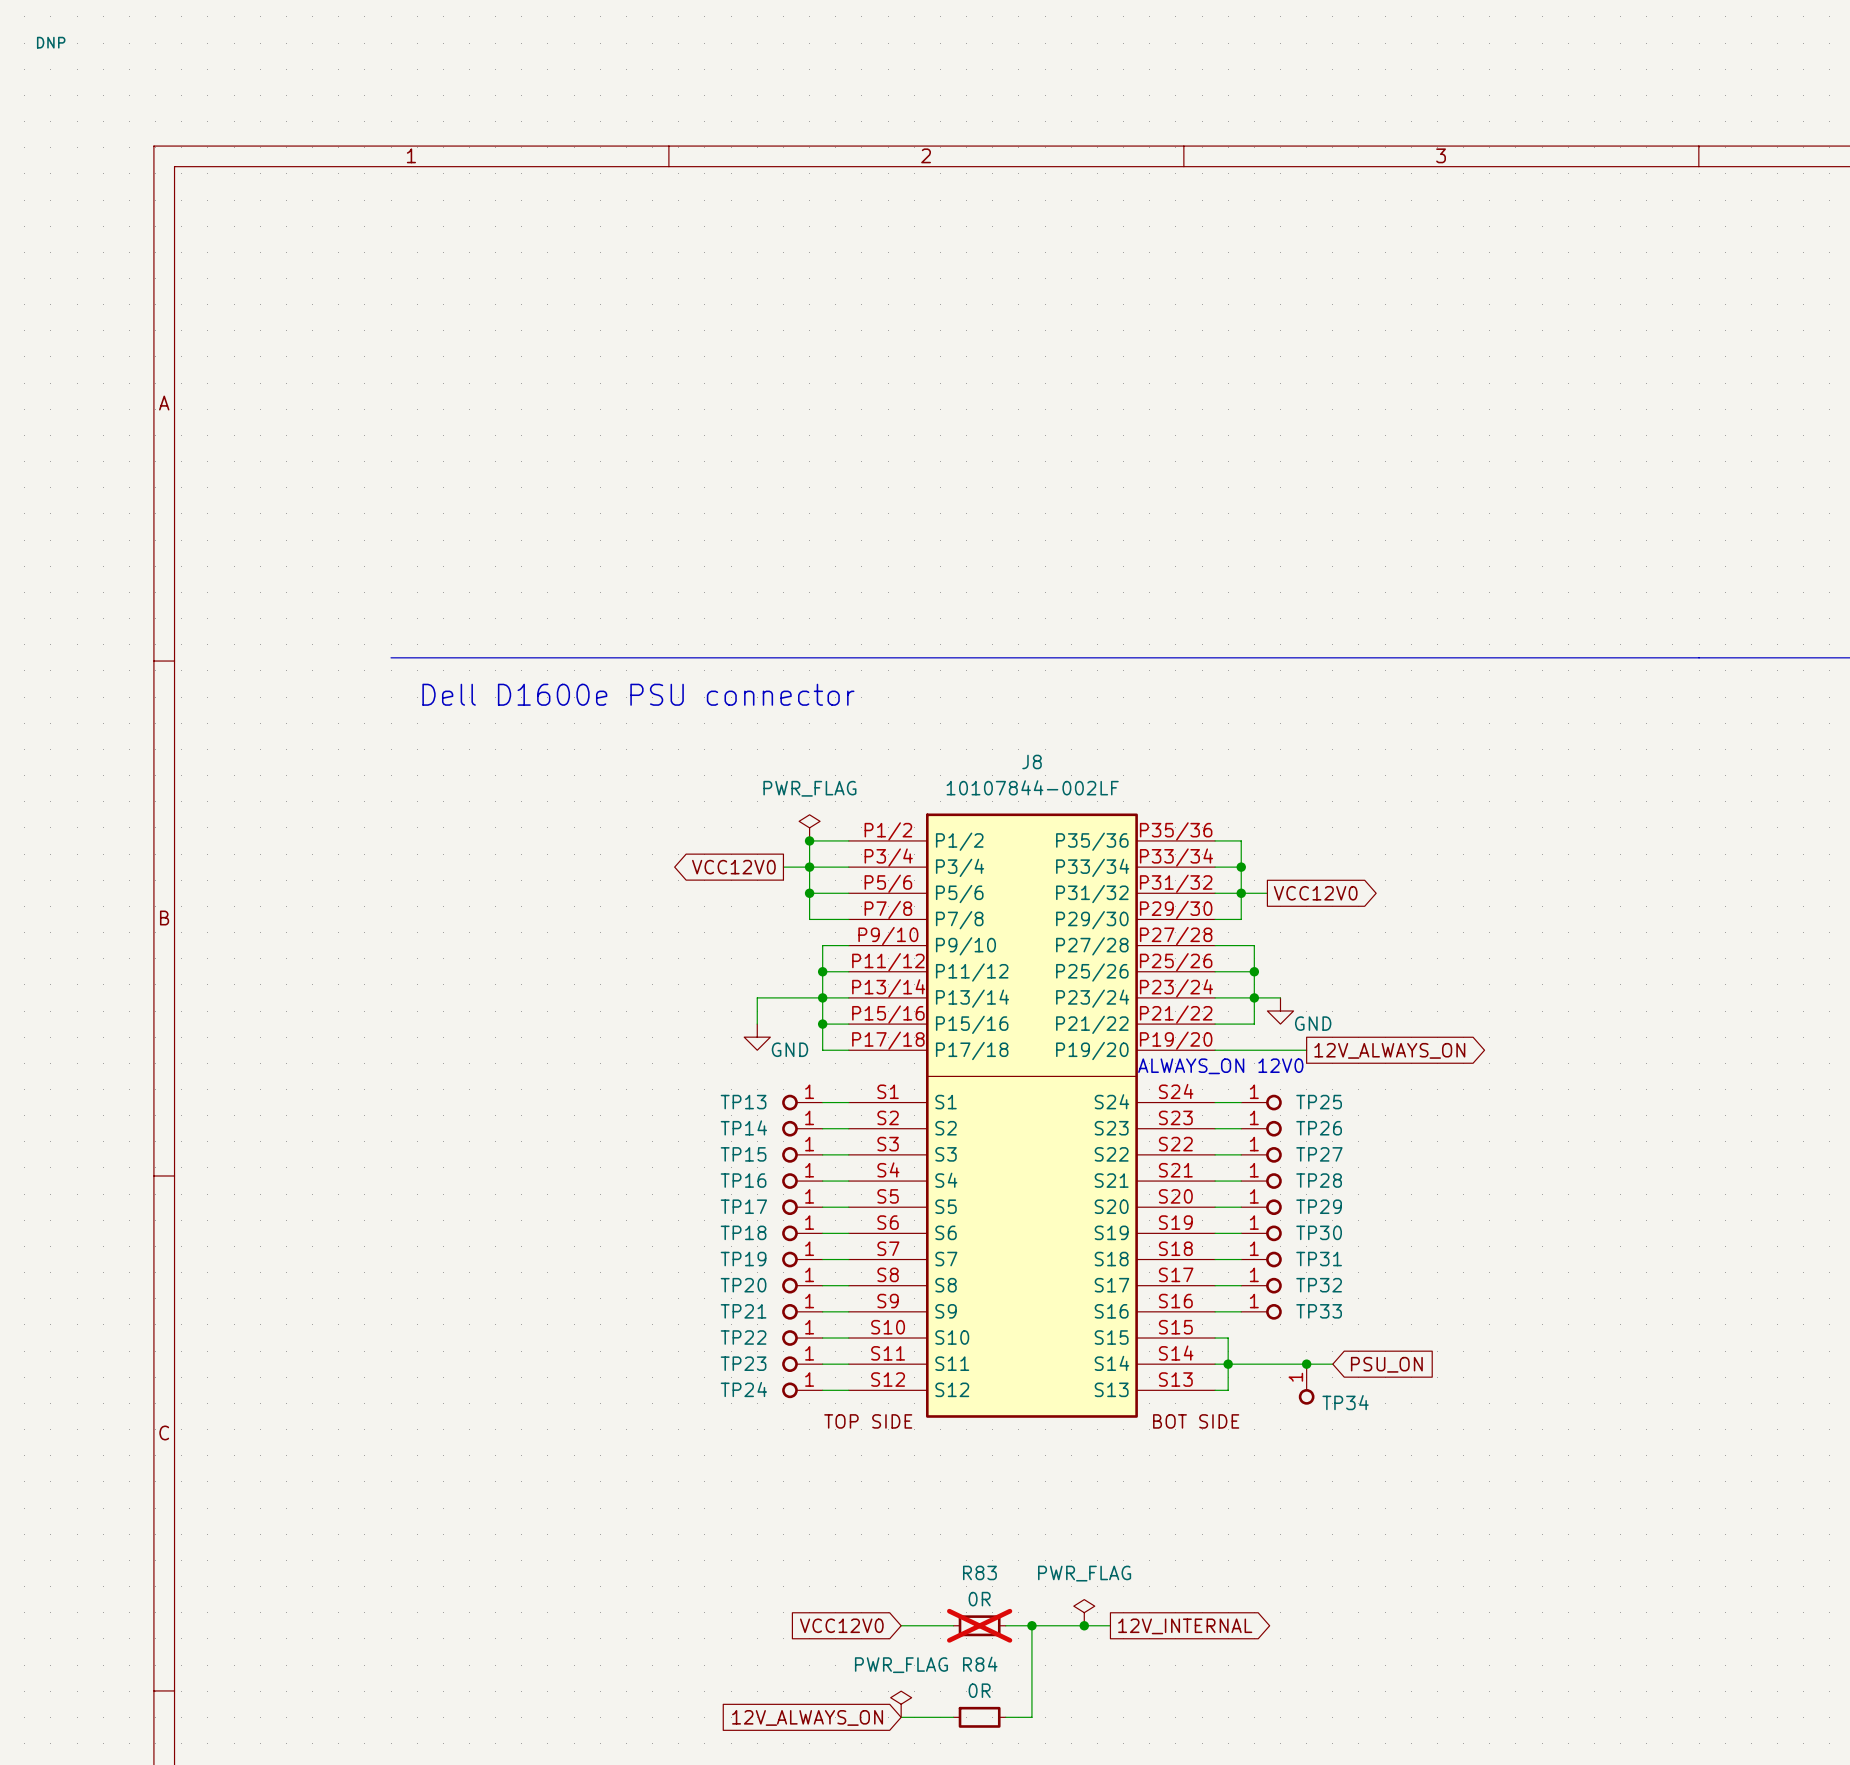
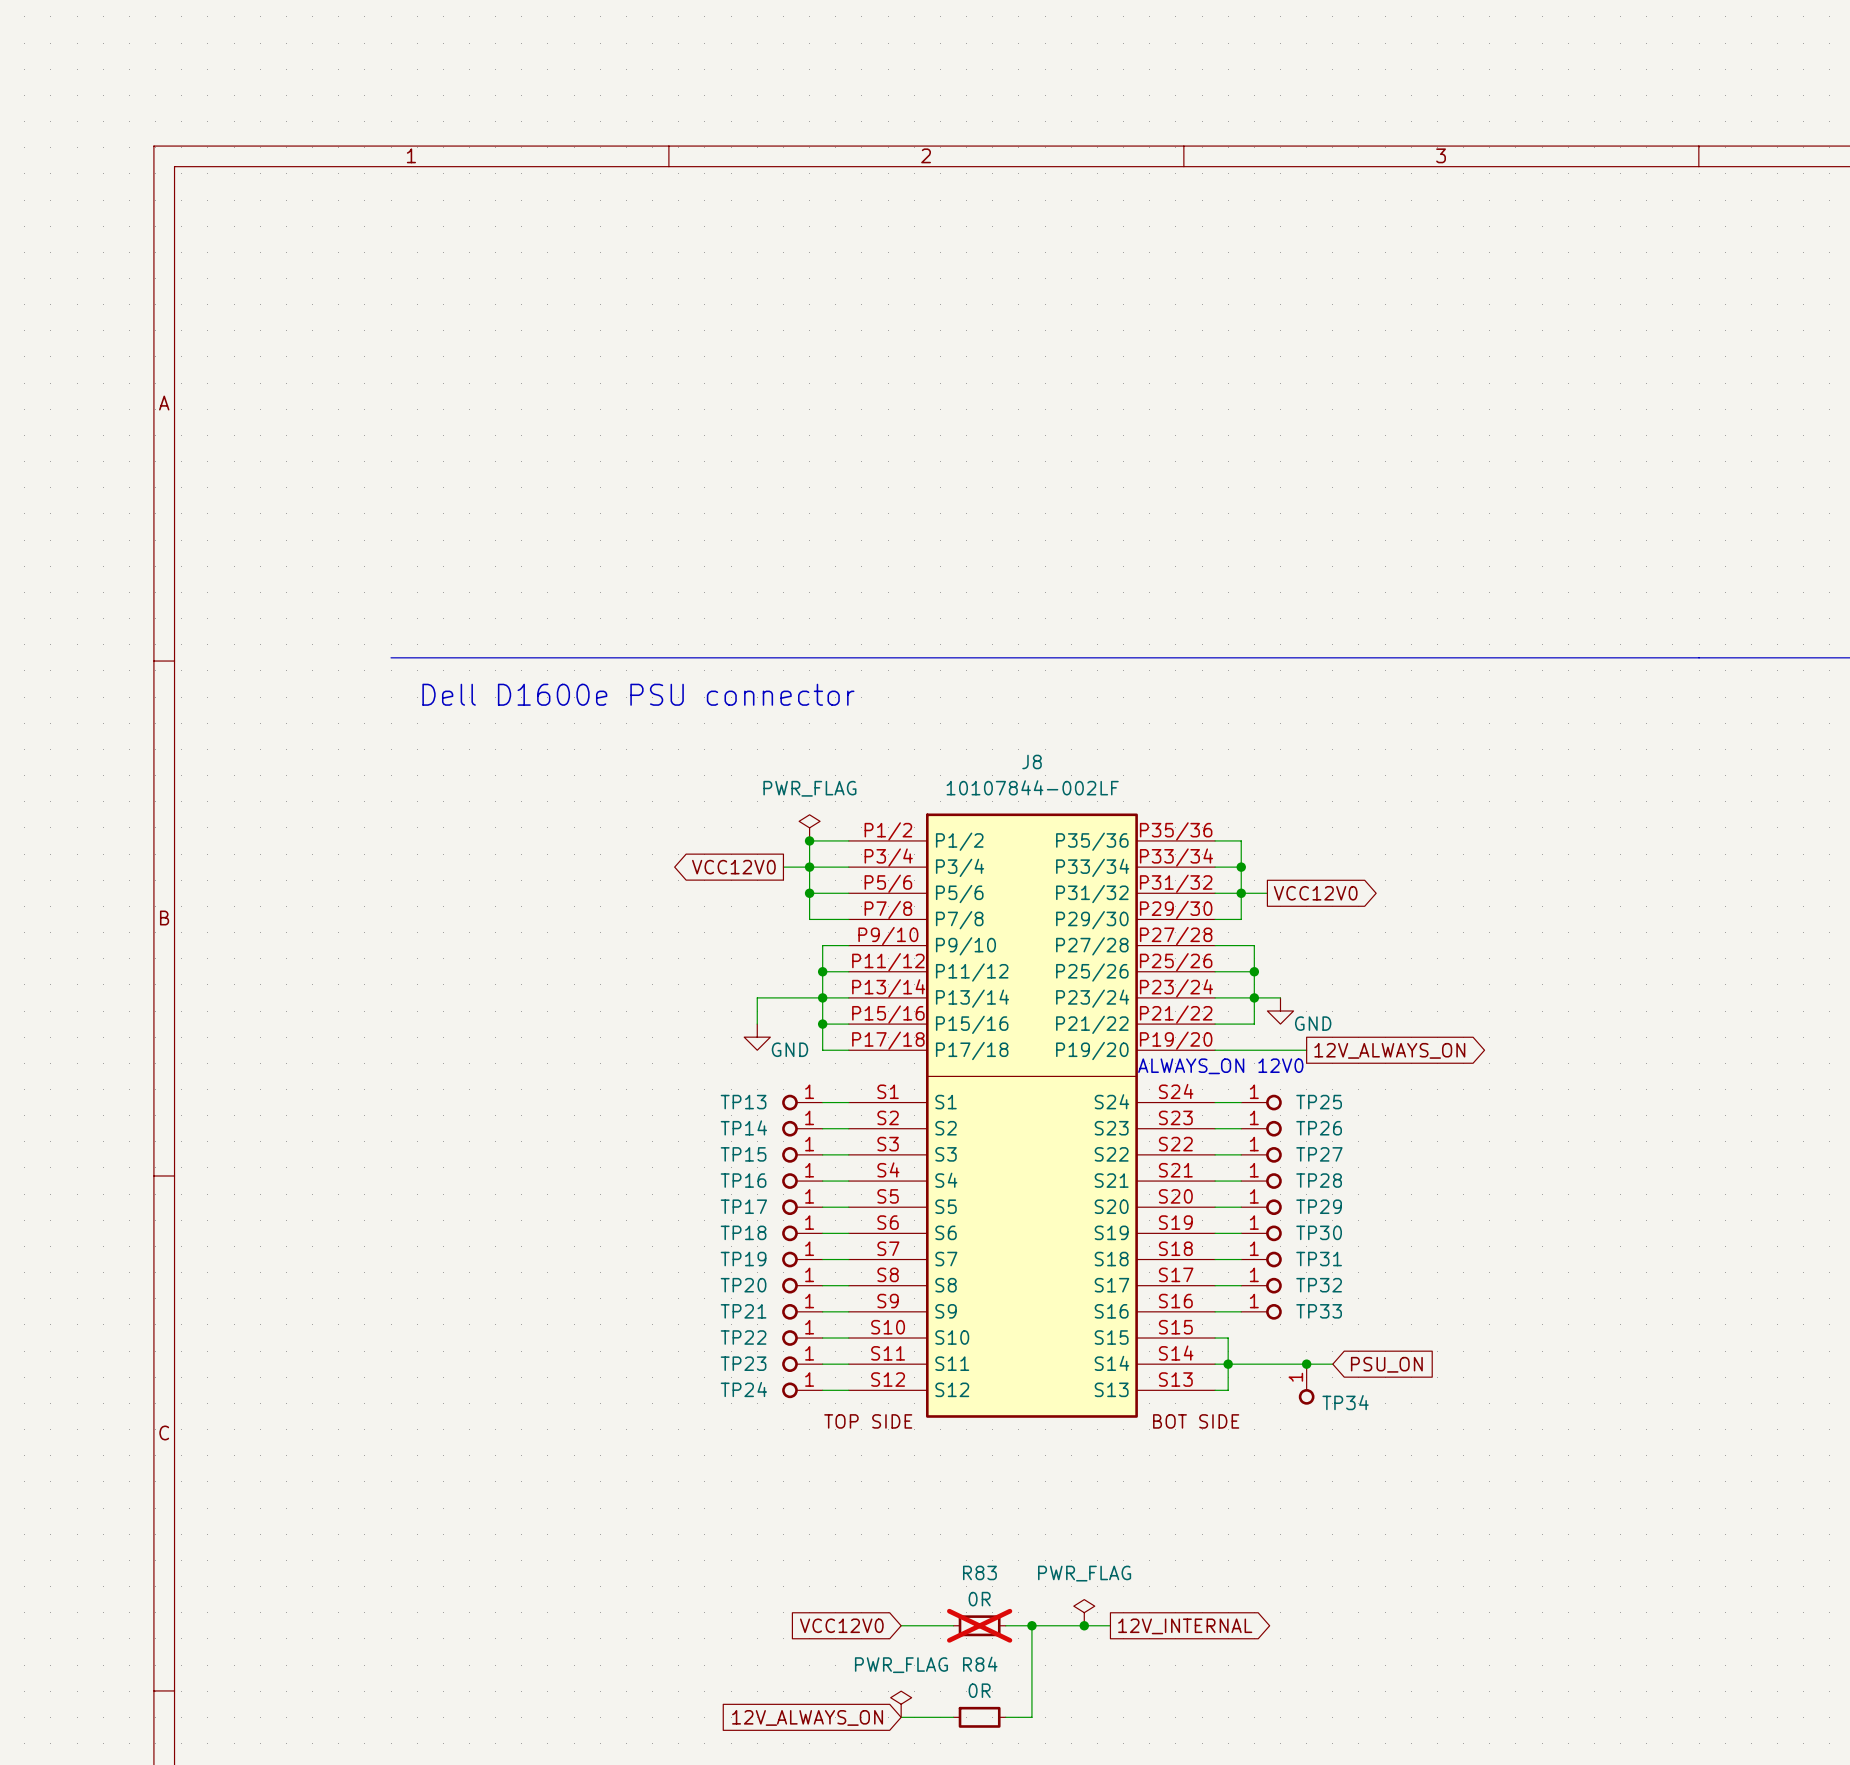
R83 text: DNP (51, 42) -> none

